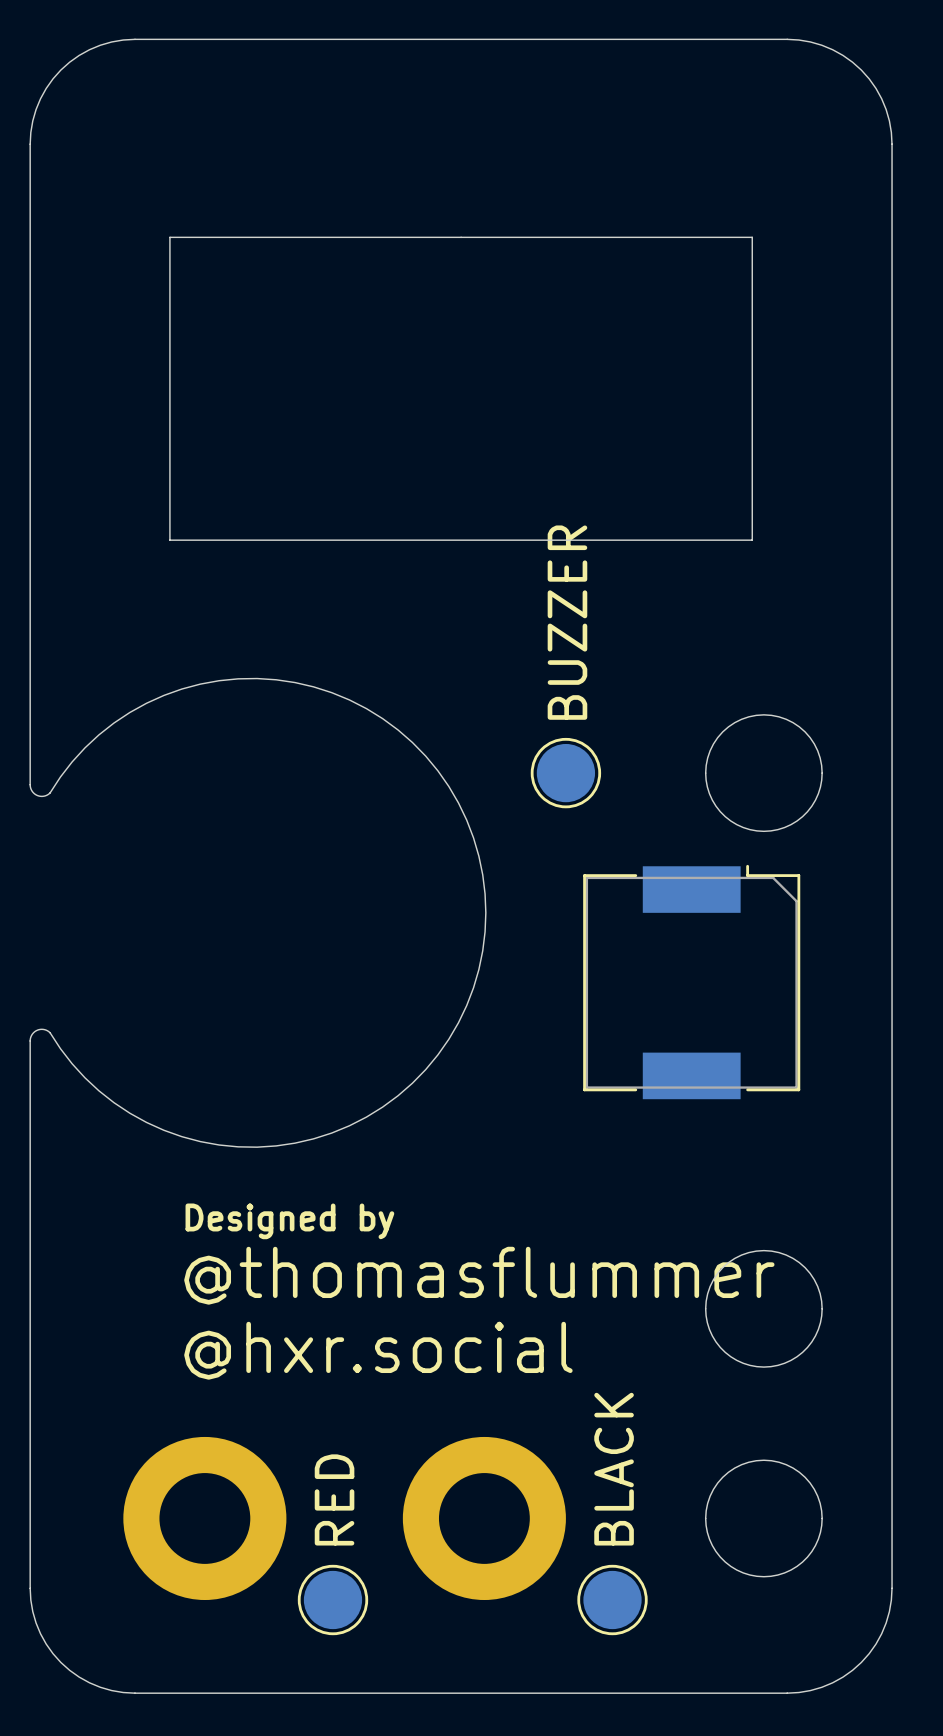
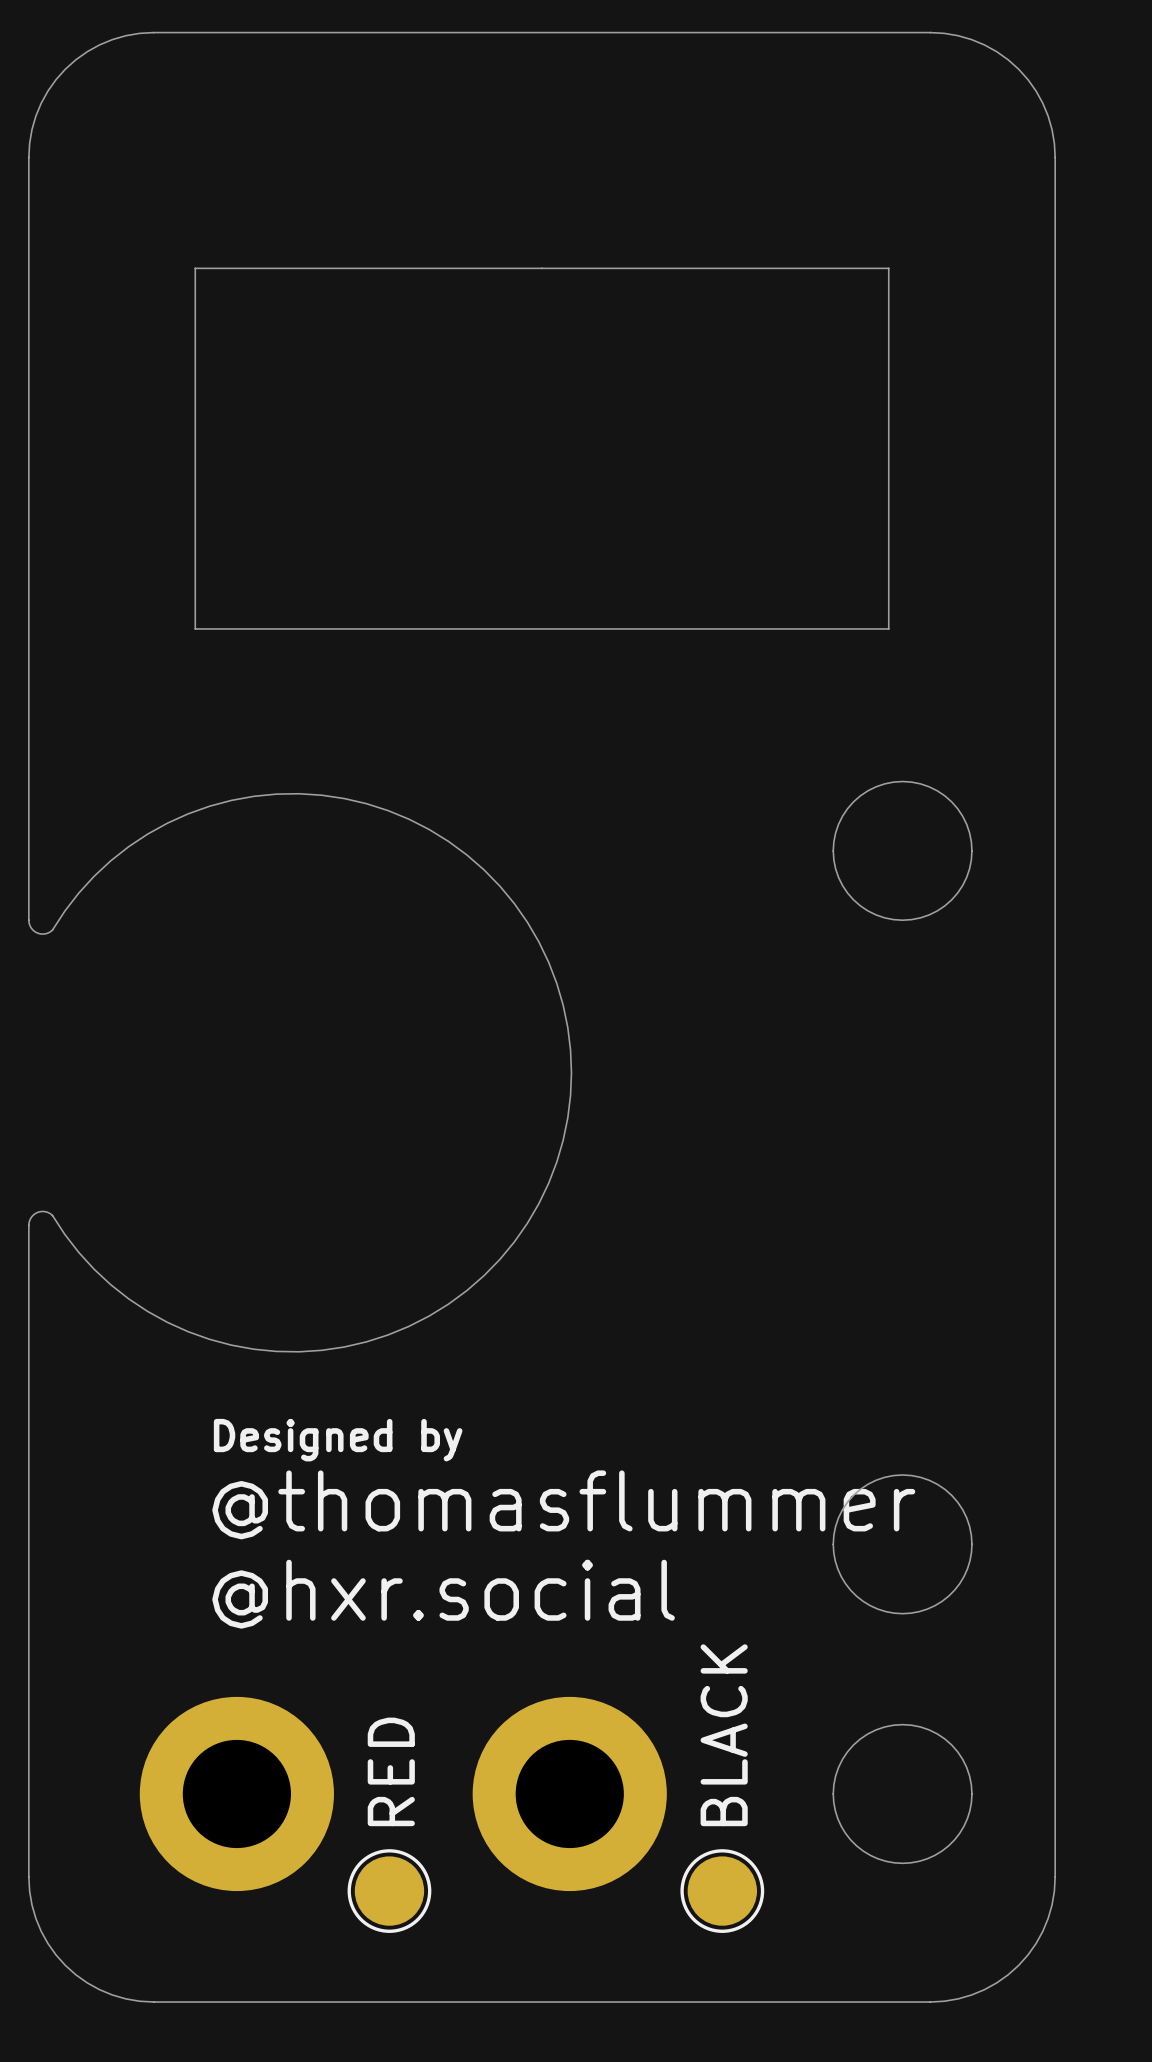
text: BUZZER (567, 622) -> none
board edge: none -> (971, 850) (966, 824) (951, 801) (929, 786) (902, 781) (876, 786) (853, 801) (838, 824) (833, 850) (838, 877) (853, 899) (876, 914) (902, 920) (929, 914) (951, 899) (966, 877) (971, 850)
part: (565, 773) -> none
board edge: (822, 773) (817, 750) (805, 731) (786, 719) (763, 714) (741, 719) (722, 731) (710, 750) (705, 773) (709, 793) (715, 806) (725, 816) (743, 827) (763, 831) (784, 827) (802, 816) (815, 800) (820, 787) (822, 773) -> none
part: (691, 982) -> none

